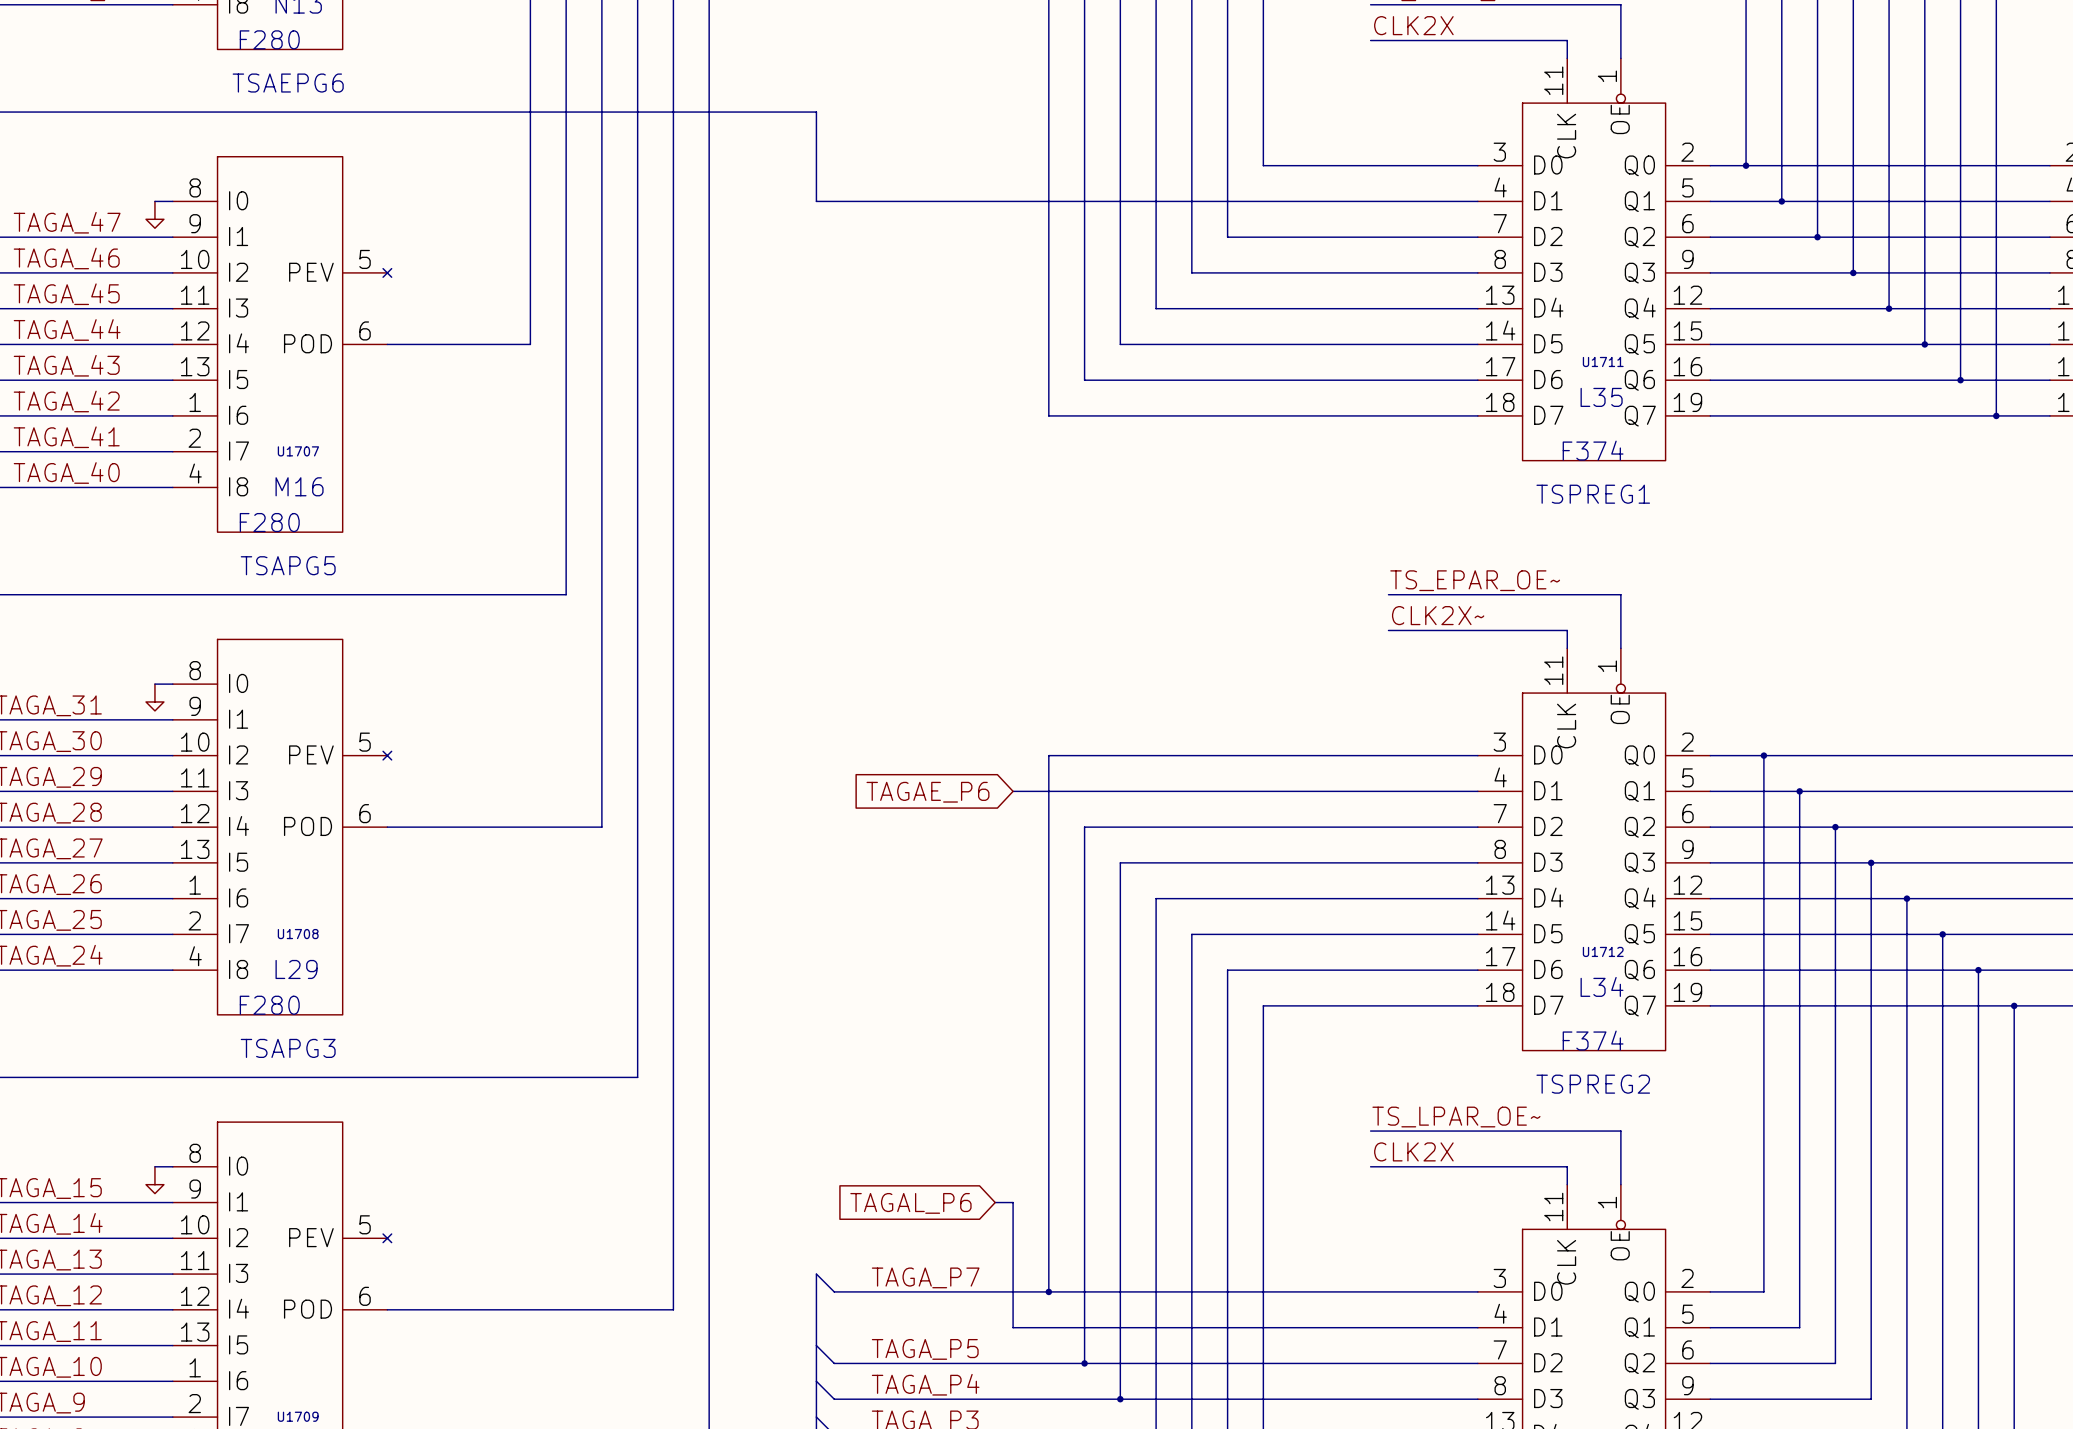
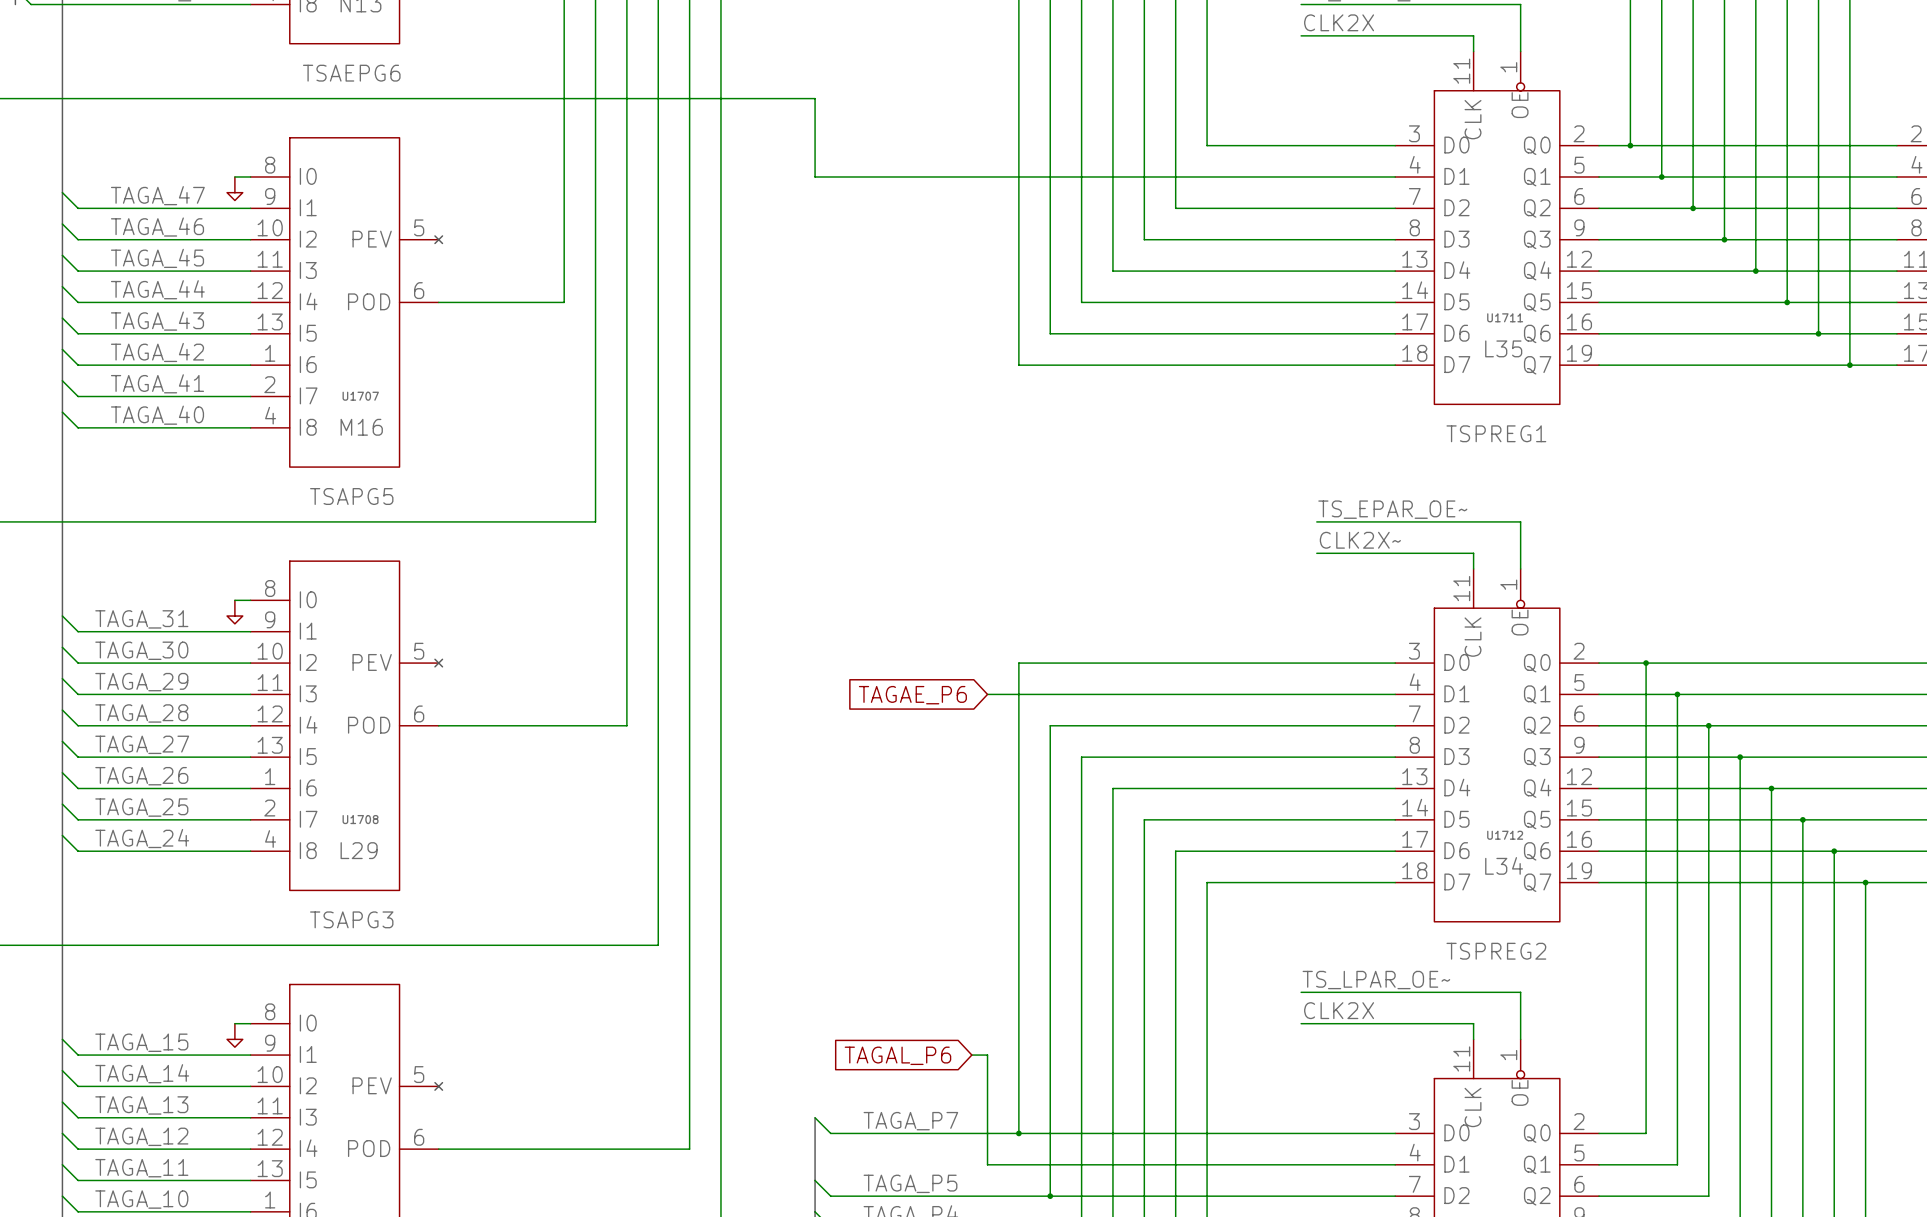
part value: F280 (269, 39) -> none
U1711 value: F374 (1593, 450) -> none
U1707 value: F280 (269, 522) -> none
U1708 value: F280 (269, 1005) -> none
U1712 value: F374 (1593, 1040) -> none

